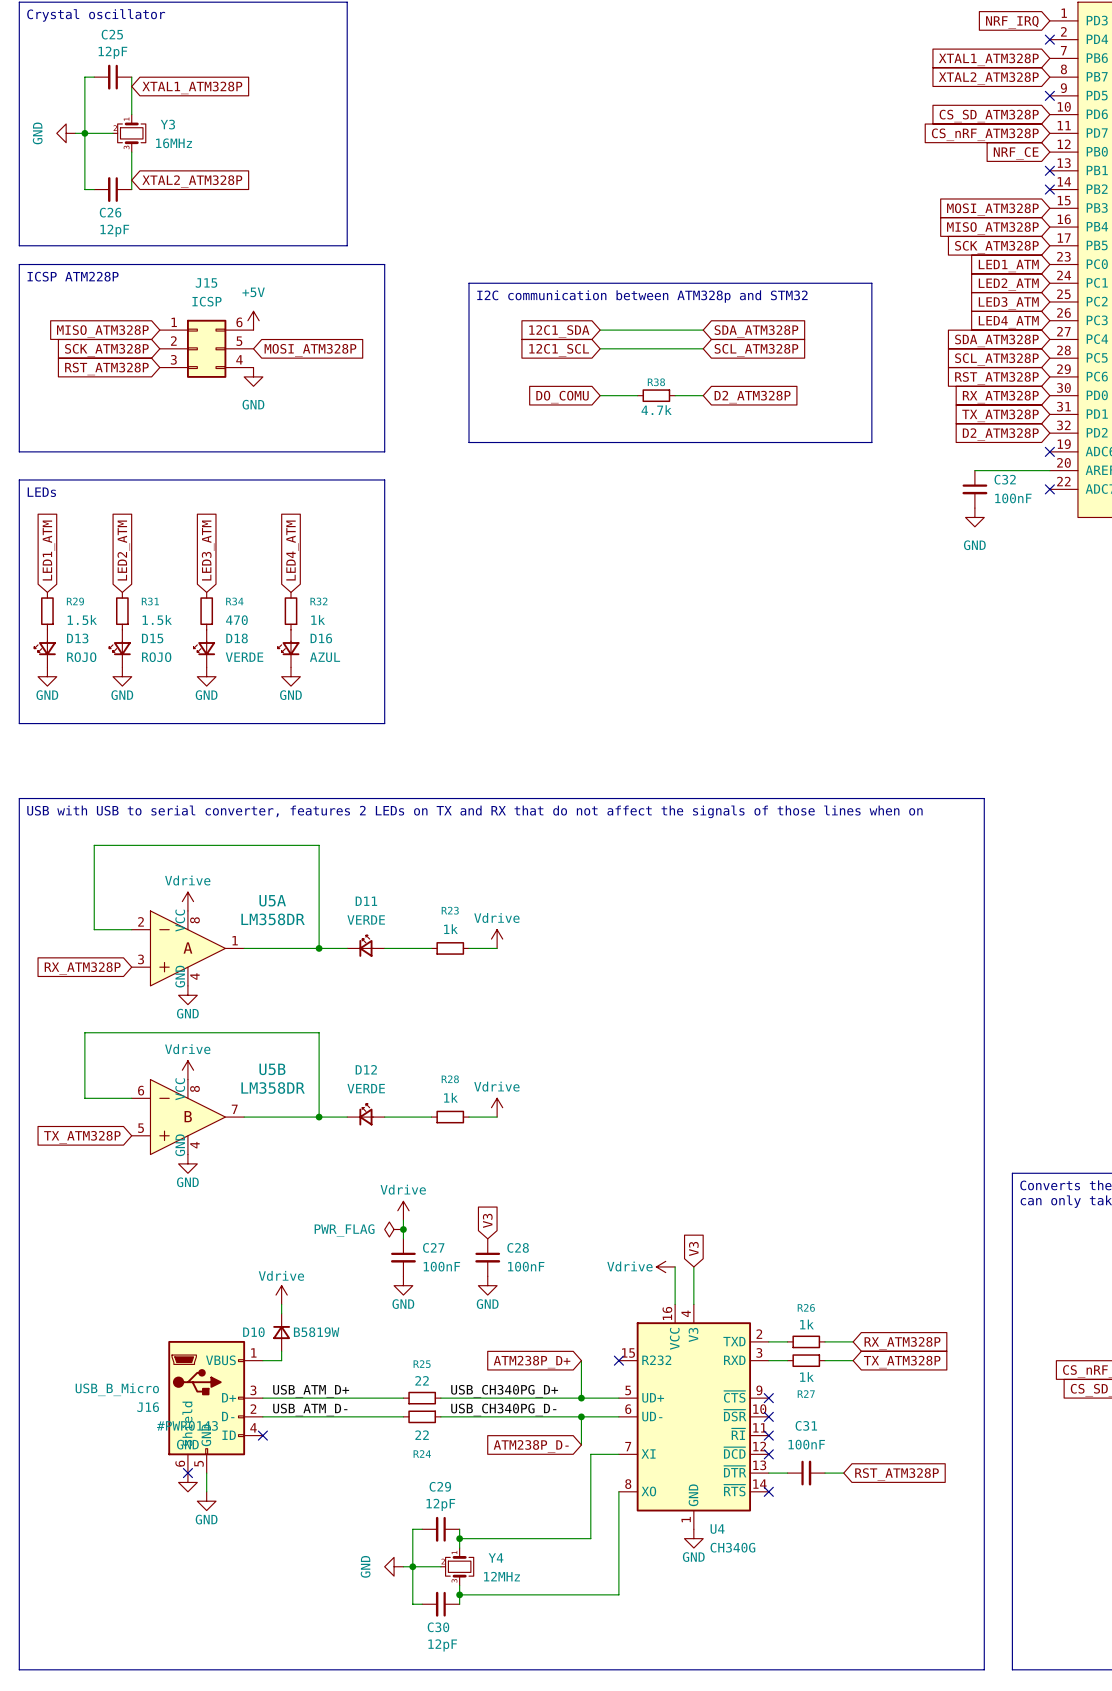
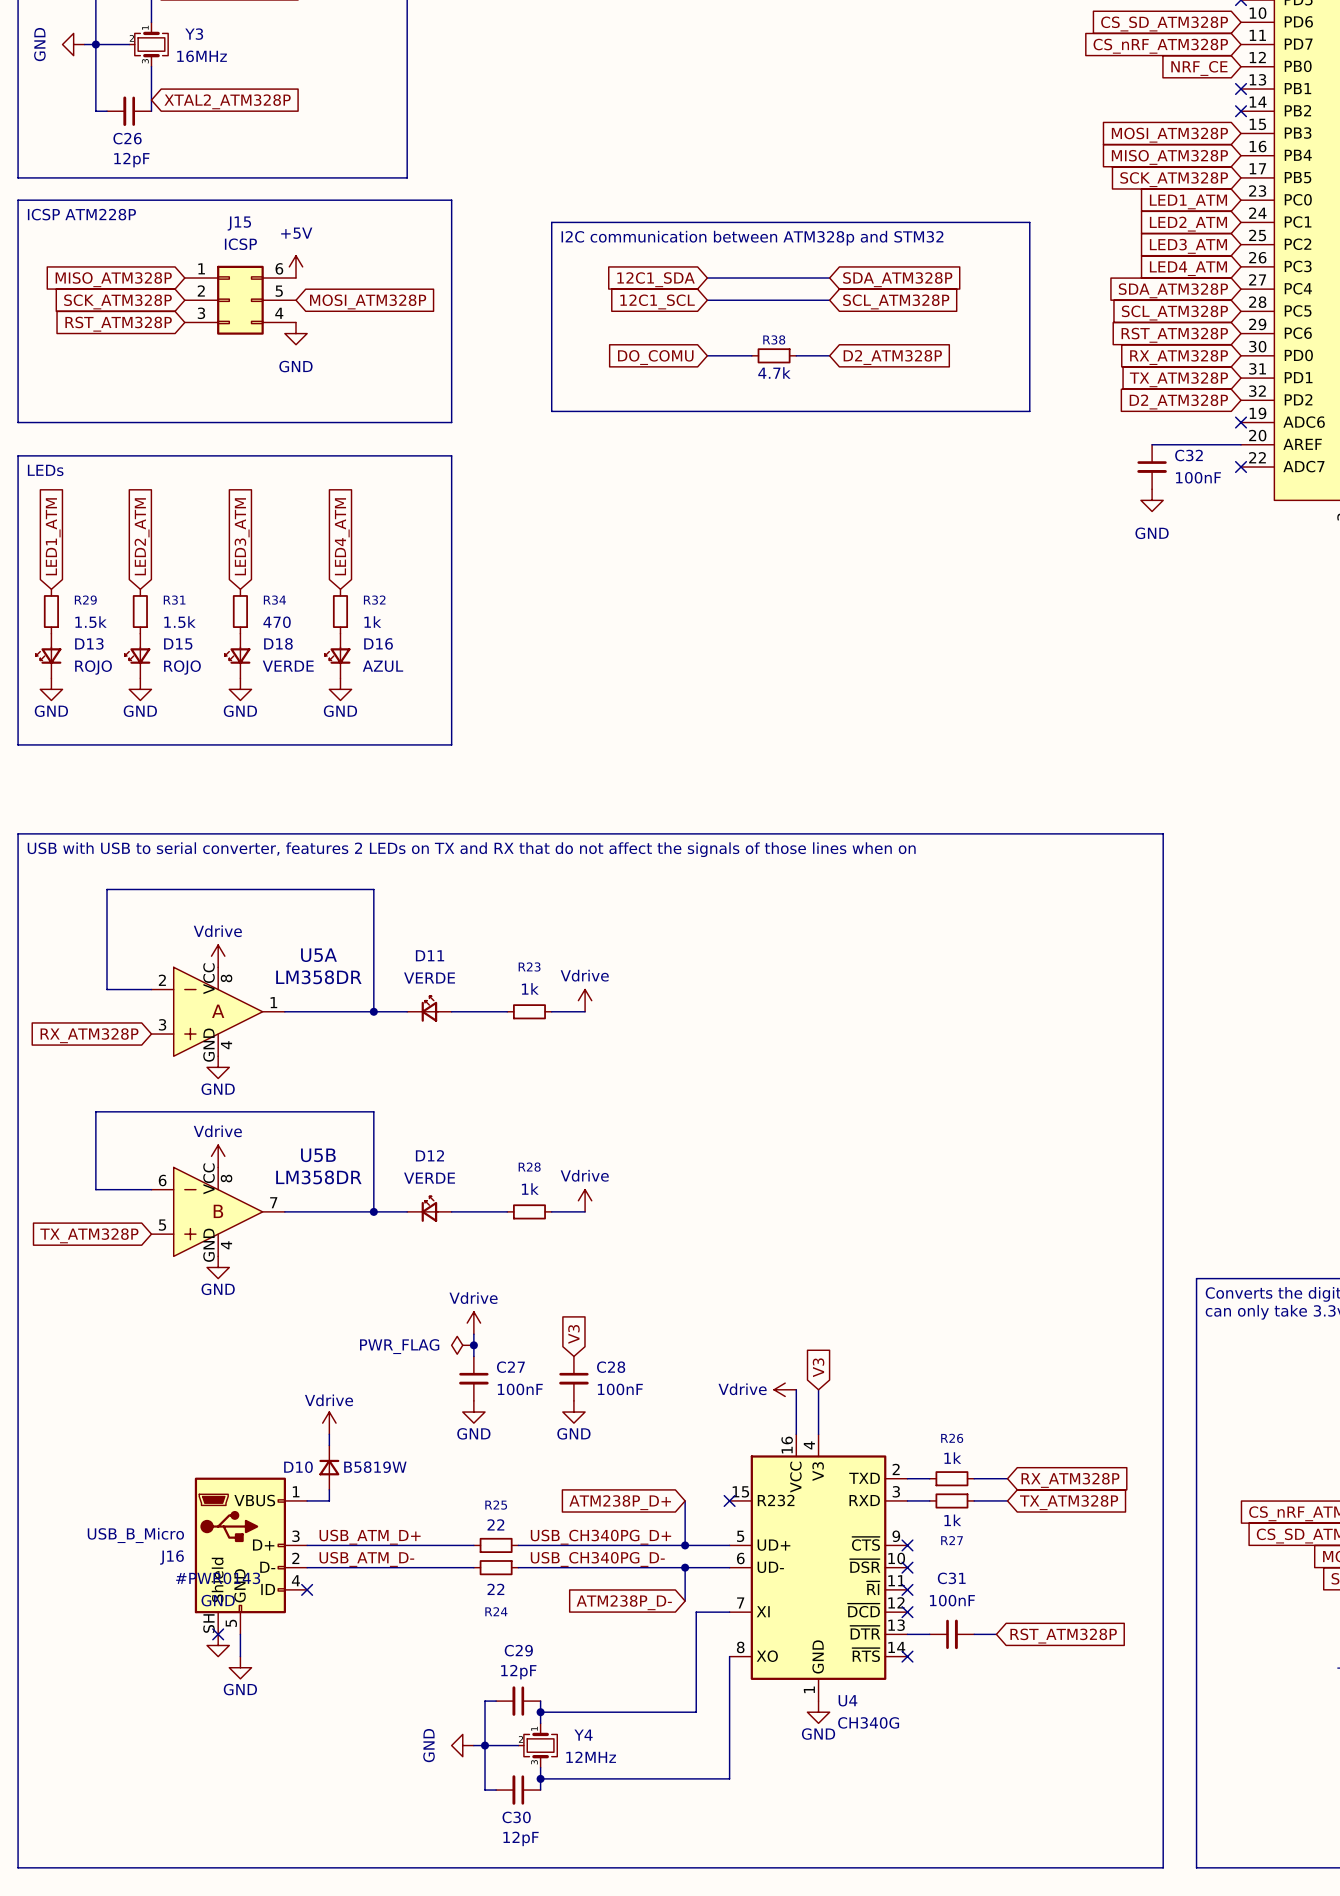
J16 pin number: 6 (180, 1463) -> SH (209, 1623)

